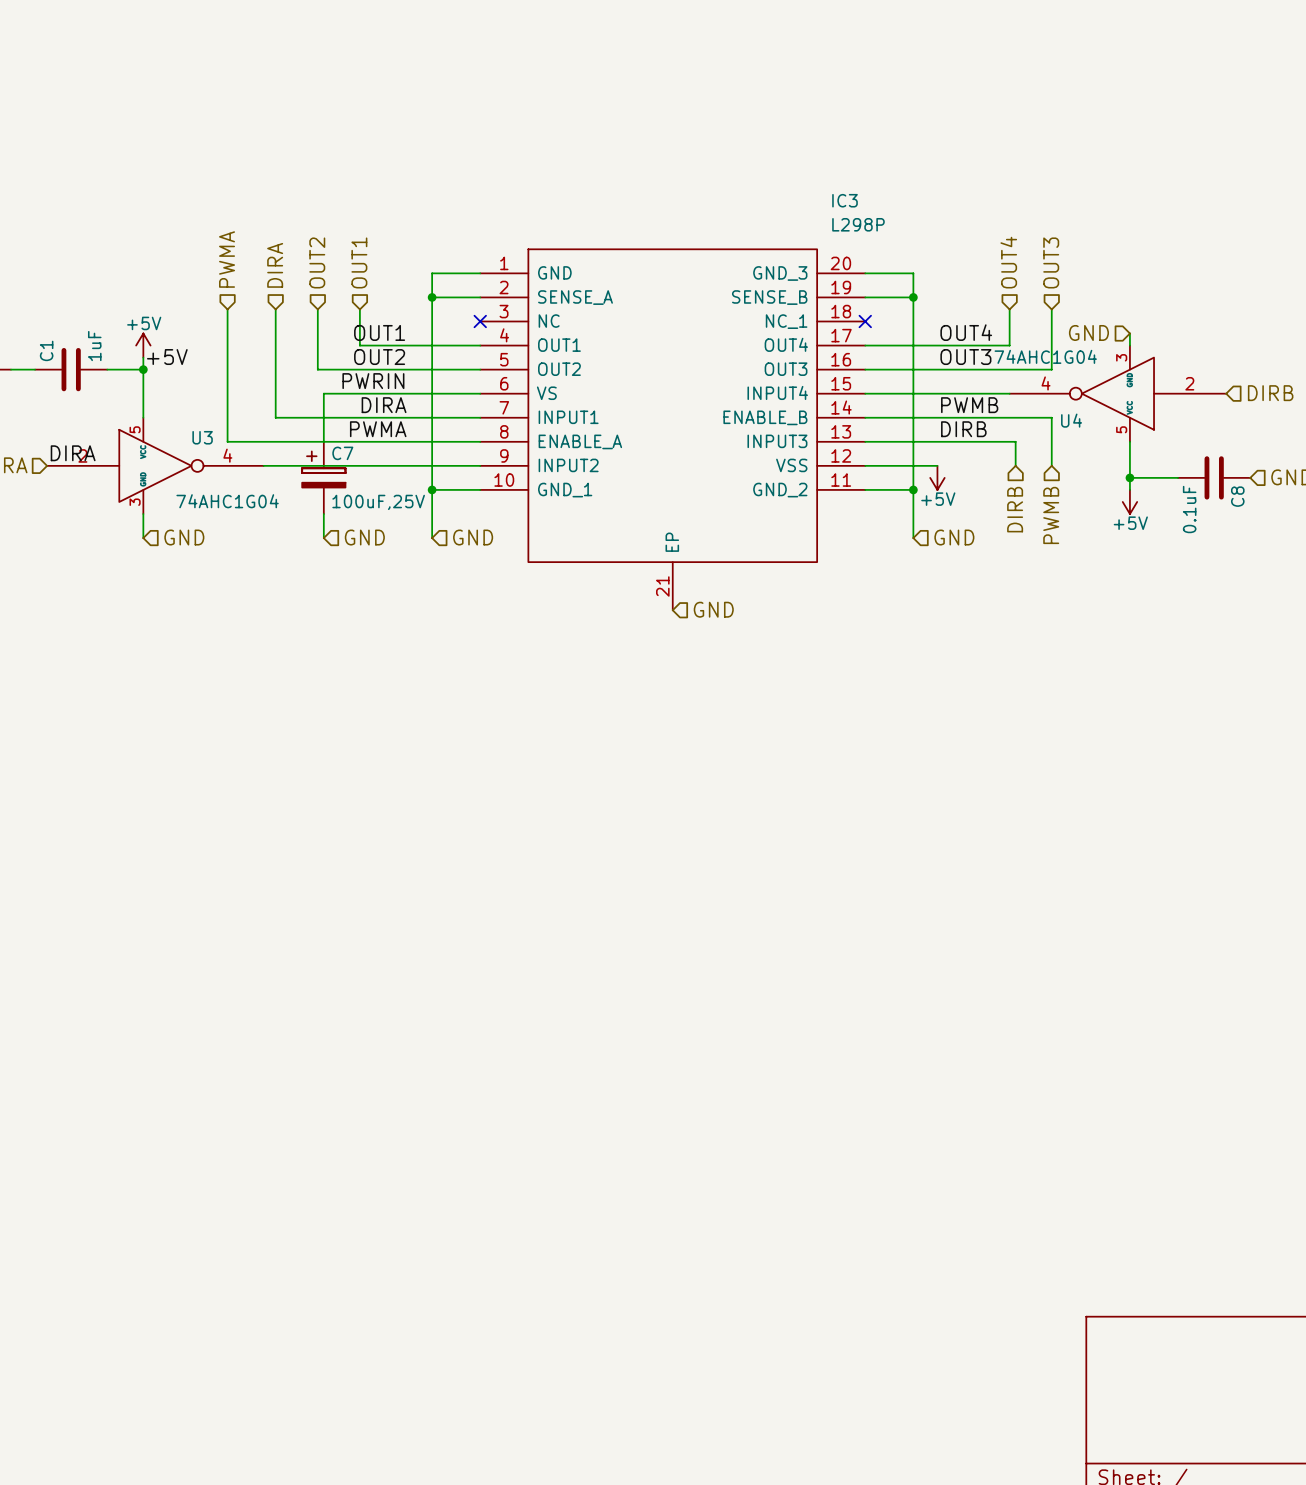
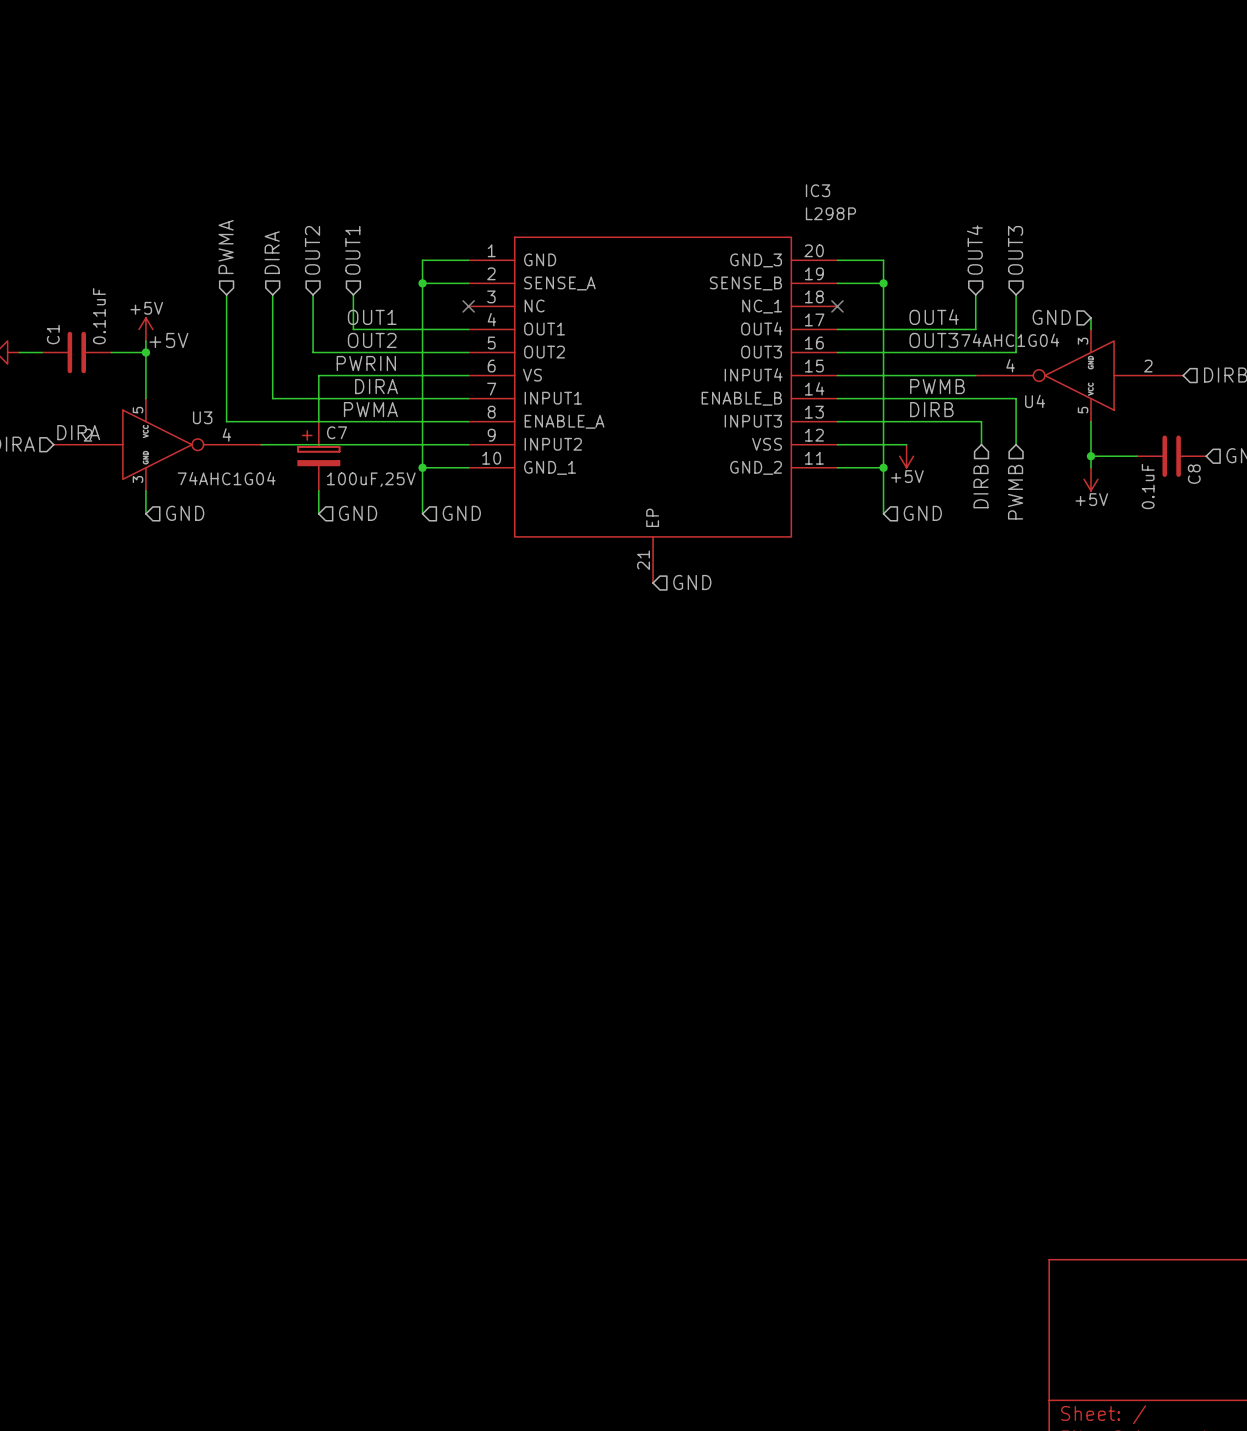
C1 value: 1uF (94, 346) -> 0.11uF (99, 316)

